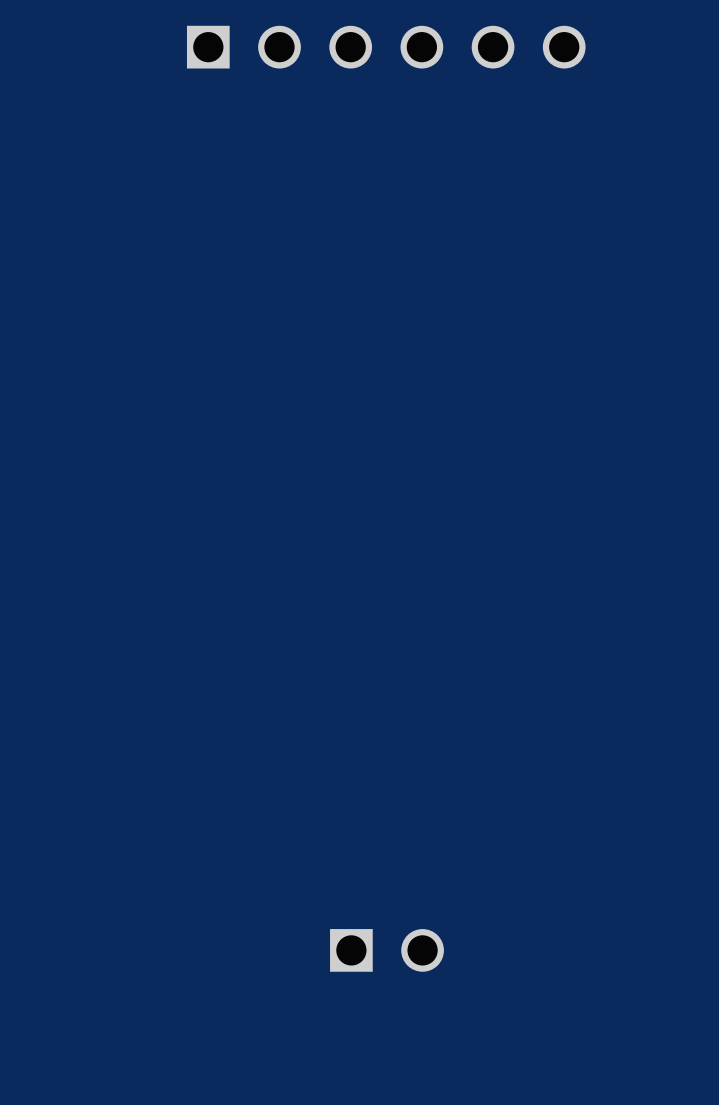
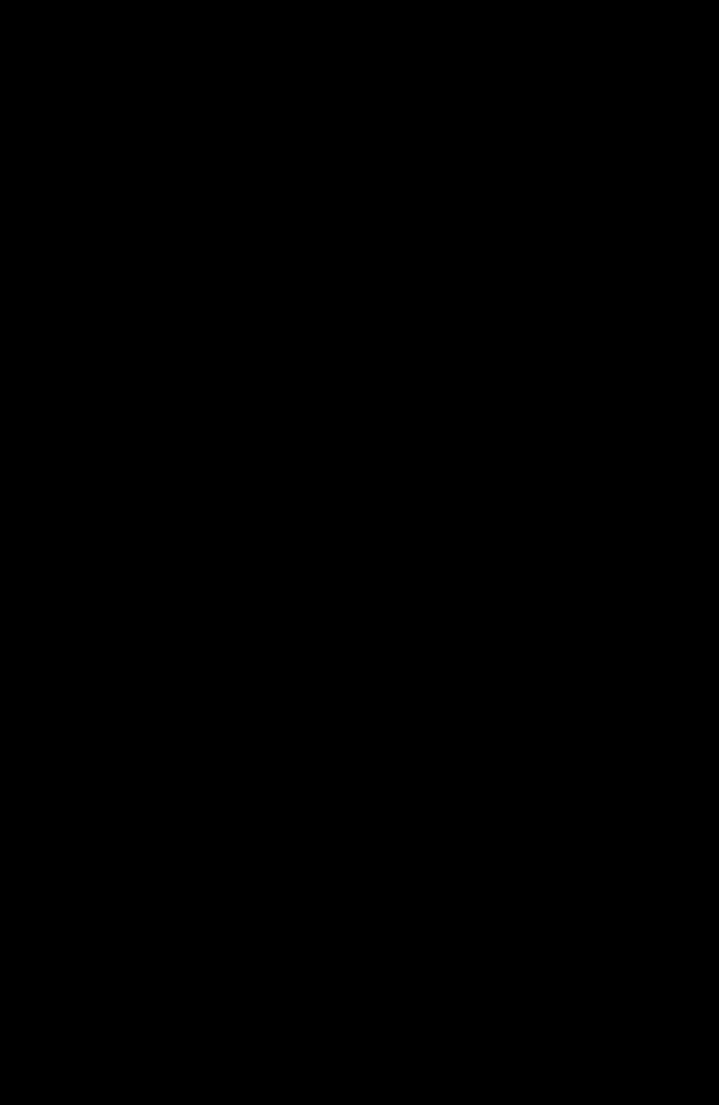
part: (386, 47) -> none
part: (386, 950) -> none

